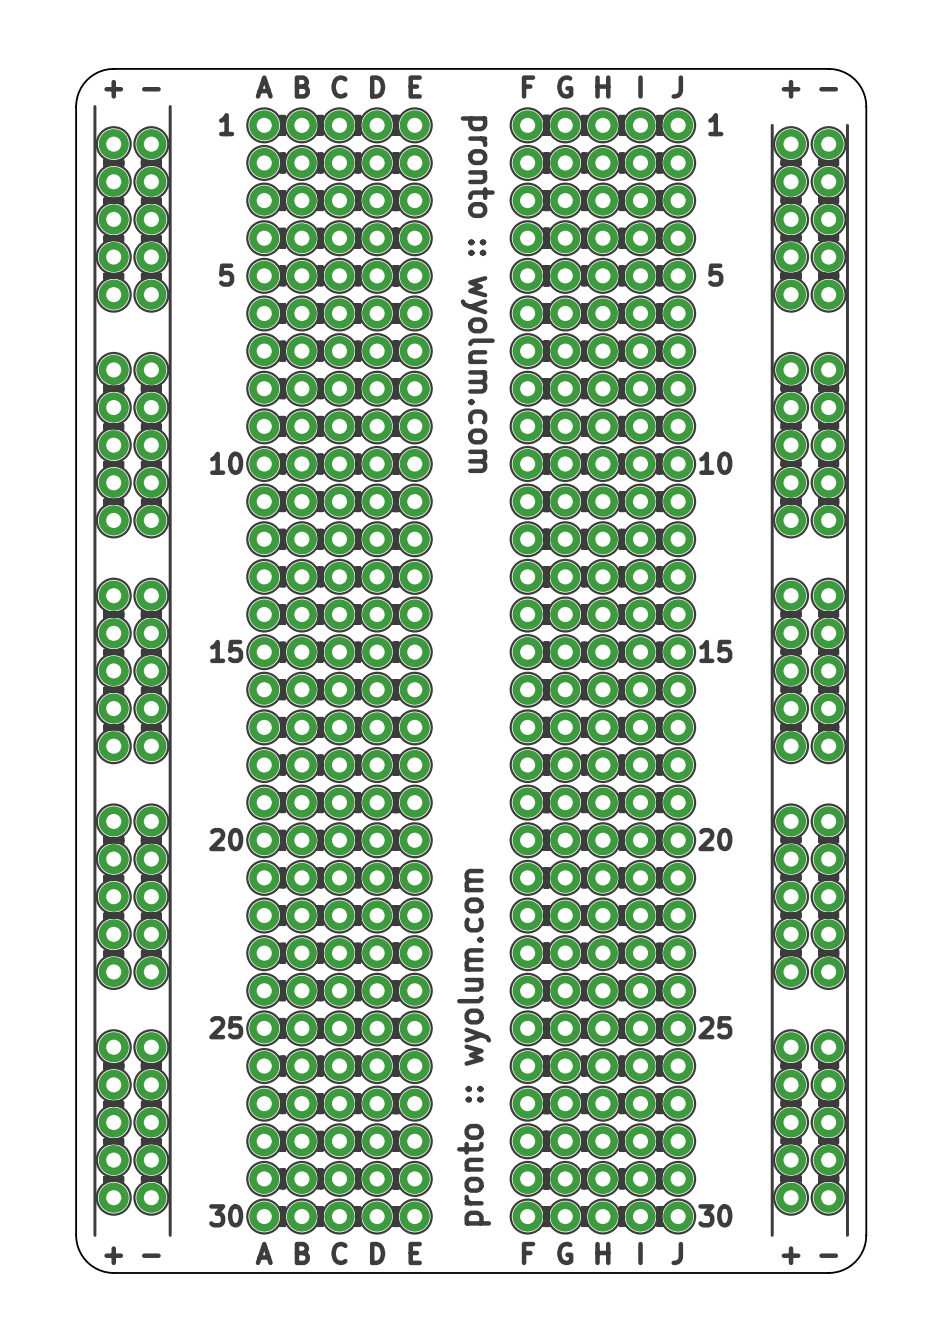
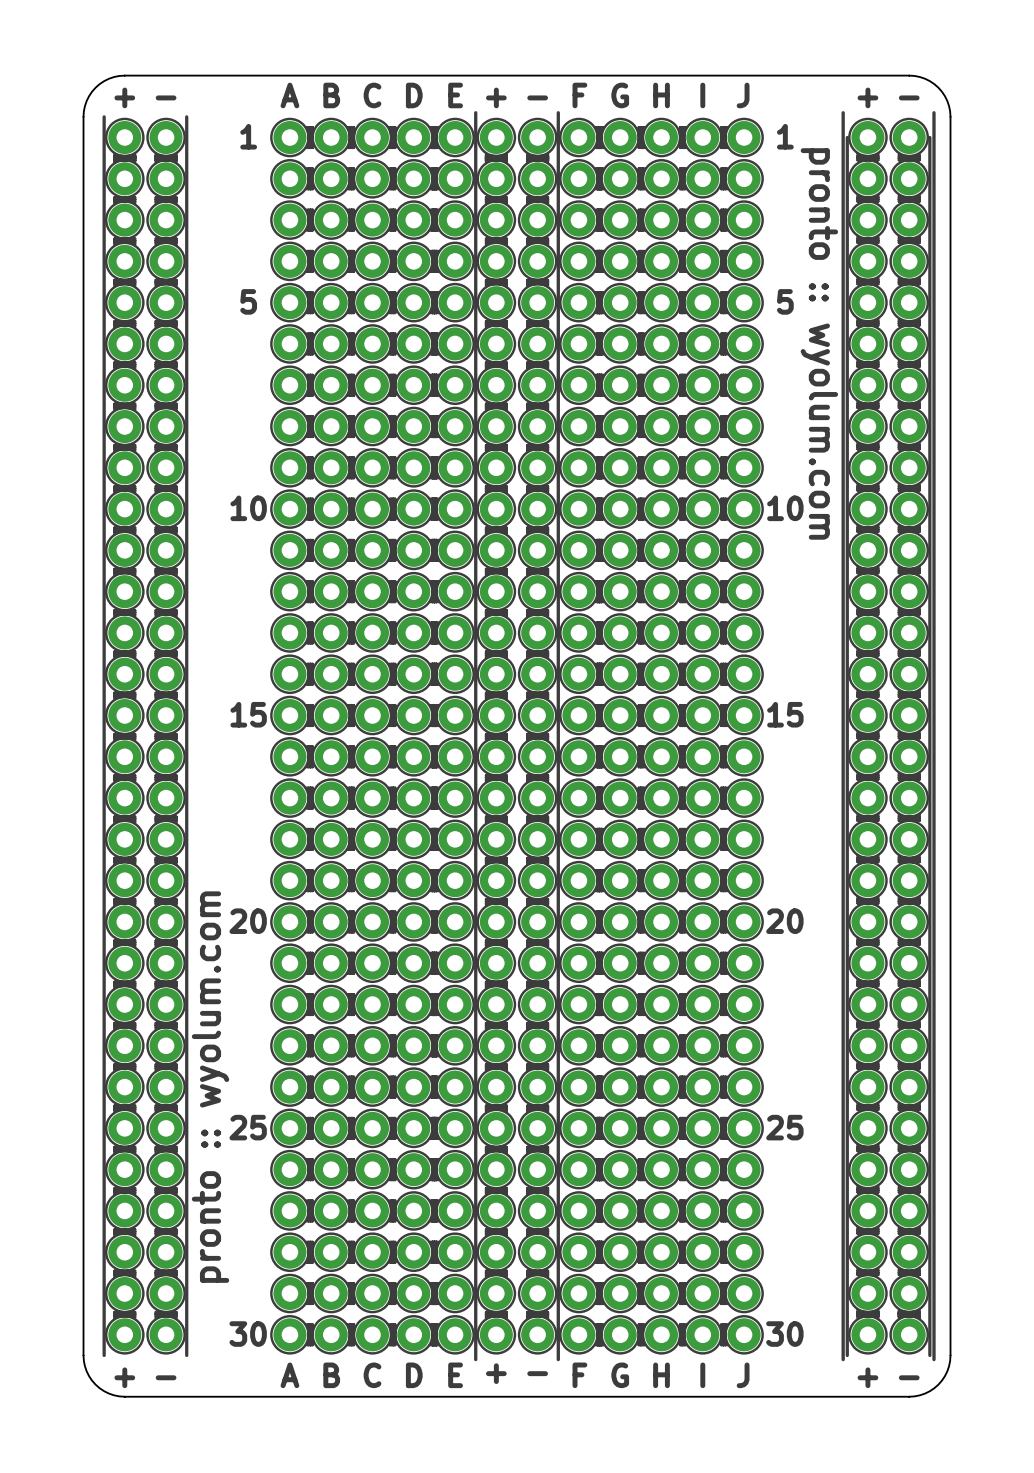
text: none -> + (496, 97)
text: none -> - (537, 97)
line: none -> (475, 112) (475, 1359)
line: none -> (558, 112) (558, 1359)
line: none -> (843, 112) (843, 1359)
line: none -> (933, 112) (933, 1359)
part: none -> (124, 139)
part: none -> (166, 139)
part: none -> (496, 139)
part: none -> (537, 139)
part: none -> (867, 139)
part: none -> (909, 139)
part: (113, 146) -> none
part: (151, 146) -> none
part: (791, 146) -> none
part: (828, 146) -> none
part: none -> (124, 176)
part: none -> (166, 176)
part: none -> (496, 176)
part: none -> (537, 176)
part: none -> (867, 180)
part: none -> (909, 180)
part: (113, 179) -> none
part: (151, 179) -> none
part: (791, 183) -> none
part: (828, 183) -> none
part: none -> (124, 218)
part: none -> (166, 218)
part: none -> (496, 218)
part: none -> (537, 218)
part: none -> (867, 222)
part: none -> (909, 222)
part: (113, 217) -> none
part: (151, 217) -> none
part: (791, 221) -> none
part: (828, 221) -> none
part: none -> (124, 259)
part: none -> (166, 259)
part: none -> (496, 259)
part: none -> (537, 259)
part: none -> (867, 263)
part: none -> (909, 263)
part: (113, 255) -> none
part: (151, 255) -> none
part: (791, 258) -> none
part: (828, 258) -> none
part: none -> (124, 300)
part: none -> (166, 300)
part: none -> (496, 300)
part: none -> (537, 300)
part: none -> (867, 304)
part: none -> (909, 304)
part: (113, 292) -> none
part: (151, 292) -> none
part: (791, 292) -> none
part: (828, 292) -> none
text position: pronto :: wyolum.com (477, 294) -> pronto :: wyolum.com (819, 343)
part: none -> (124, 341)
part: none -> (166, 341)
part: none -> (496, 341)
part: none -> (537, 341)
part: none -> (867, 346)
part: none -> (909, 346)
part: none -> (124, 383)
part: none -> (166, 383)
part: none -> (496, 383)
part: none -> (537, 383)
part: none -> (867, 387)
part: none -> (909, 387)
part: (113, 371) -> none
part: (151, 371) -> none
part: (791, 371) -> none
part: (828, 371) -> none
part: none -> (124, 424)
part: none -> (166, 424)
part: none -> (496, 424)
part: none -> (537, 424)
part: none -> (867, 428)
part: none -> (909, 428)
part: (113, 405) -> none
part: (151, 405) -> none
part: (791, 409) -> none
part: (828, 409) -> none
part: none -> (124, 465)
part: none -> (166, 465)
part: none -> (496, 465)
part: none -> (537, 465)
part: none -> (867, 469)
part: none -> (909, 469)
part: (113, 443) -> none
part: (151, 443) -> none
part: (791, 447) -> none
part: (828, 447) -> none
part: none -> (124, 507)
part: none -> (166, 507)
part: none -> (496, 507)
part: none -> (537, 507)
part: none -> (867, 511)
part: none -> (909, 511)
part: (113, 480) -> none
part: (151, 480) -> none
part: (791, 484) -> none
part: (828, 484) -> none
part: none -> (124, 548)
part: none -> (166, 548)
part: none -> (496, 548)
part: none -> (537, 548)
part: none -> (867, 552)
part: none -> (909, 552)
part: (113, 518) -> none
part: (151, 518) -> none
part: (791, 518) -> none
part: (828, 518) -> none
part: none -> (124, 589)
part: none -> (166, 589)
part: none -> (496, 589)
part: none -> (537, 589)
part: none -> (867, 593)
part: none -> (909, 593)
part: none -> (124, 630)
part: none -> (166, 630)
part: none -> (496, 630)
part: none -> (537, 630)
part: none -> (867, 635)
part: none -> (909, 635)
part: (113, 597) -> none
part: (151, 597) -> none
part: (791, 597) -> none
part: (828, 597) -> none
part: none -> (124, 672)
part: none -> (166, 672)
part: none -> (496, 672)
part: none -> (537, 672)
part: none -> (867, 676)
part: none -> (909, 676)
part: (113, 631) -> none
part: (151, 631) -> none
part: (791, 635) -> none
part: (828, 635) -> none
part: none -> (124, 713)
part: none -> (166, 713)
part: none -> (496, 713)
part: none -> (537, 713)
part: none -> (867, 717)
part: none -> (909, 717)
part: (113, 669) -> none
part: (151, 669) -> none
part: (791, 672) -> none
part: (828, 672) -> none
part: none -> (124, 754)
part: none -> (166, 754)
part: none -> (496, 754)
part: none -> (537, 754)
part: none -> (867, 758)
part: none -> (909, 758)
part: (113, 706) -> none
part: (151, 706) -> none
part: (791, 710) -> none
part: (828, 710) -> none
part: none -> (124, 796)
part: none -> (166, 796)
part: none -> (496, 796)
part: none -> (537, 796)
part: none -> (867, 800)
part: none -> (909, 800)
part: (113, 744) -> none
part: (151, 744) -> none
part: (791, 744) -> none
part: (828, 744) -> none
part: none -> (124, 837)
part: none -> (166, 837)
part: none -> (496, 837)
part: none -> (537, 837)
part: none -> (867, 841)
part: none -> (909, 841)
part: none -> (124, 878)
part: none -> (166, 878)
part: none -> (496, 878)
part: none -> (537, 878)
part: none -> (867, 882)
part: none -> (909, 882)
part: (113, 823) -> none
part: (151, 823) -> none
part: (791, 823) -> none
part: (828, 823) -> none
part: none -> (124, 919)
part: none -> (166, 919)
part: none -> (496, 919)
part: none -> (537, 919)
part: none -> (867, 924)
part: none -> (909, 924)
part: (113, 857) -> none
part: (151, 857) -> none
part: (791, 860) -> none
part: (828, 860) -> none
part: none -> (124, 961)
part: none -> (166, 961)
part: none -> (496, 961)
part: none -> (537, 961)
part: none -> (867, 965)
part: none -> (909, 965)
part: (113, 894) -> none
part: (151, 894) -> none
part: (791, 898) -> none
part: (828, 898) -> none
part: none -> (124, 1002)
part: none -> (166, 1002)
part: none -> (496, 1002)
part: none -> (537, 1002)
part: none -> (867, 1006)
part: none -> (909, 1006)
part: (113, 932) -> none
part: (151, 932) -> none
part: (791, 936) -> none
part: (828, 936) -> none
part: none -> (124, 1043)
part: none -> (166, 1043)
part: none -> (496, 1043)
part: none -> (537, 1043)
part: none -> (867, 1047)
part: none -> (909, 1047)
part: (113, 970) -> none
part: (151, 970) -> none
part: (791, 970) -> none
part: (828, 970) -> none
part: none -> (124, 1085)
part: none -> (166, 1085)
part: none -> (496, 1085)
part: none -> (537, 1085)
part: none -> (867, 1089)
part: none -> (909, 1089)
part: none -> (124, 1126)
part: none -> (166, 1126)
part: none -> (496, 1126)
part: none -> (537, 1126)
part: none -> (867, 1130)
part: none -> (909, 1130)
text position: pronto :: wyolum.com (474, 1047) -> pronto :: wyolum.com (210, 1087)
part: (113, 1049) -> none
part: (151, 1049) -> none
part: (791, 1049) -> none
part: (828, 1049) -> none
part: none -> (124, 1167)
part: none -> (166, 1167)
part: none -> (496, 1167)
part: none -> (537, 1167)
part: none -> (867, 1171)
part: none -> (909, 1171)
part: (113, 1082) -> none
part: (151, 1082) -> none
part: (791, 1086) -> none
part: (828, 1086) -> none
part: none -> (124, 1208)
part: none -> (166, 1208)
part: none -> (496, 1208)
part: none -> (537, 1208)
part: none -> (867, 1213)
part: none -> (909, 1213)
part: (113, 1120) -> none
part: (151, 1120) -> none
part: (791, 1124) -> none
part: (828, 1124) -> none
part: none -> (124, 1250)
part: none -> (166, 1250)
part: none -> (496, 1250)
part: none -> (537, 1250)
part: none -> (867, 1254)
part: none -> (909, 1254)
part: (113, 1158) -> none
part: (151, 1158) -> none
part: (791, 1161) -> none
part: (828, 1161) -> none
part: none -> (124, 1291)
part: none -> (166, 1291)
part: none -> (496, 1291)
part: none -> (537, 1291)
part: none -> (867, 1295)
part: none -> (909, 1295)
part: (113, 1195) -> none
part: (151, 1195) -> none
part: (791, 1195) -> none
part: (828, 1195) -> none
part: none -> (124, 1332)
part: none -> (166, 1332)
part: none -> (496, 1332)
part: none -> (537, 1332)
part: none -> (867, 1332)
part: none -> (909, 1332)
text: none -> + (496, 1373)
text: none -> - (537, 1373)

